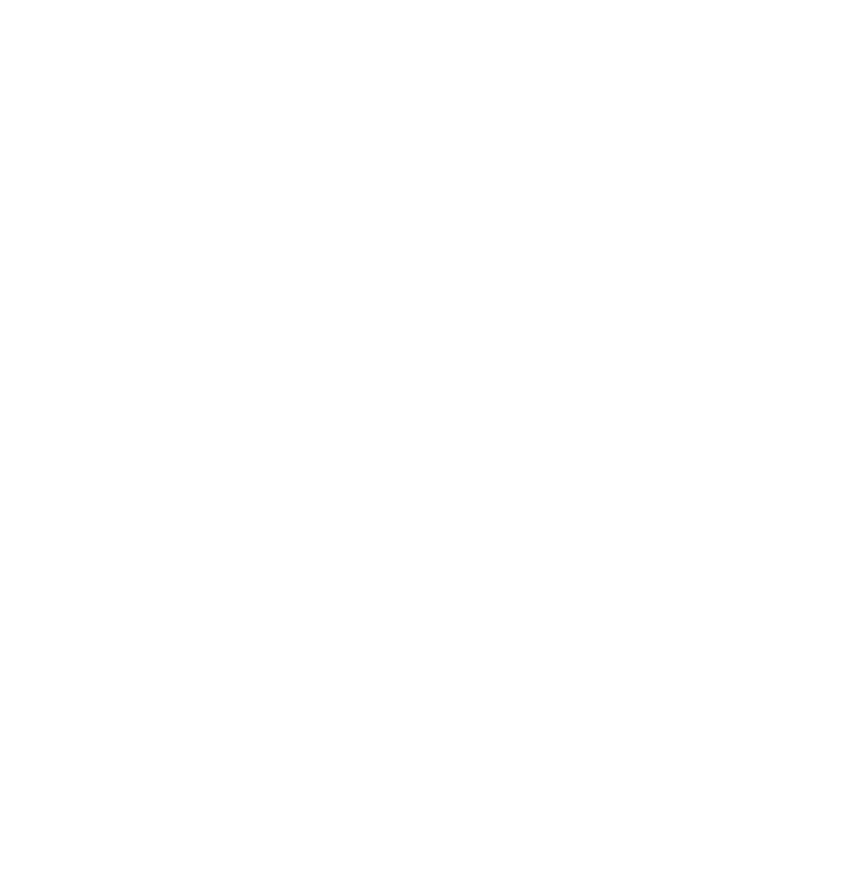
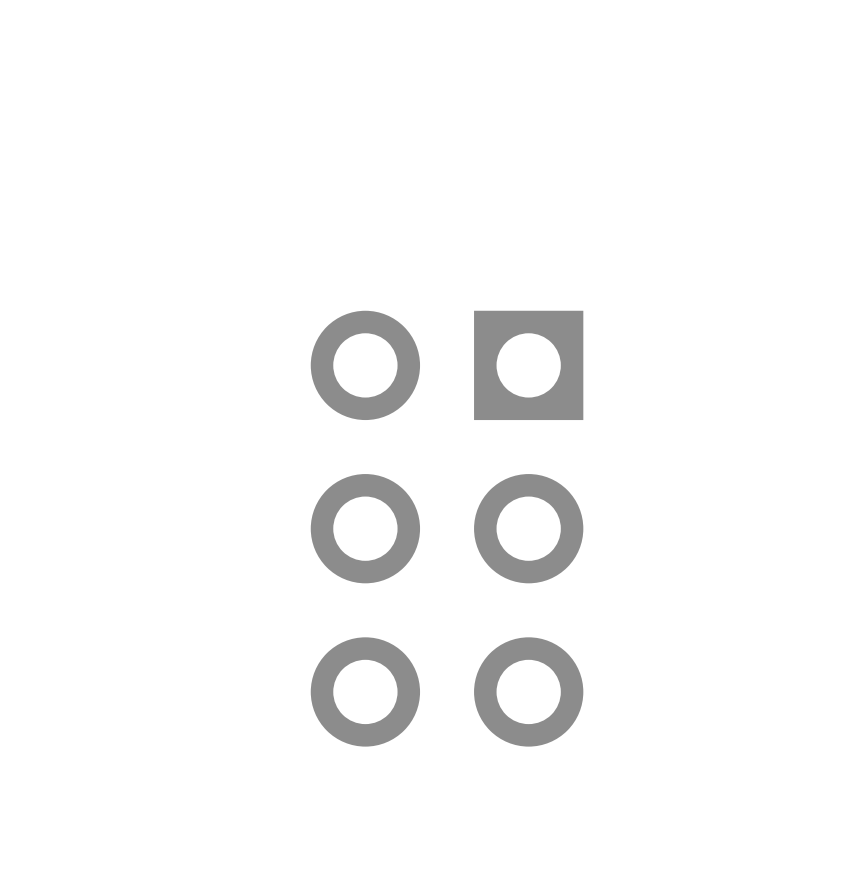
part: none -> (447, 528)

